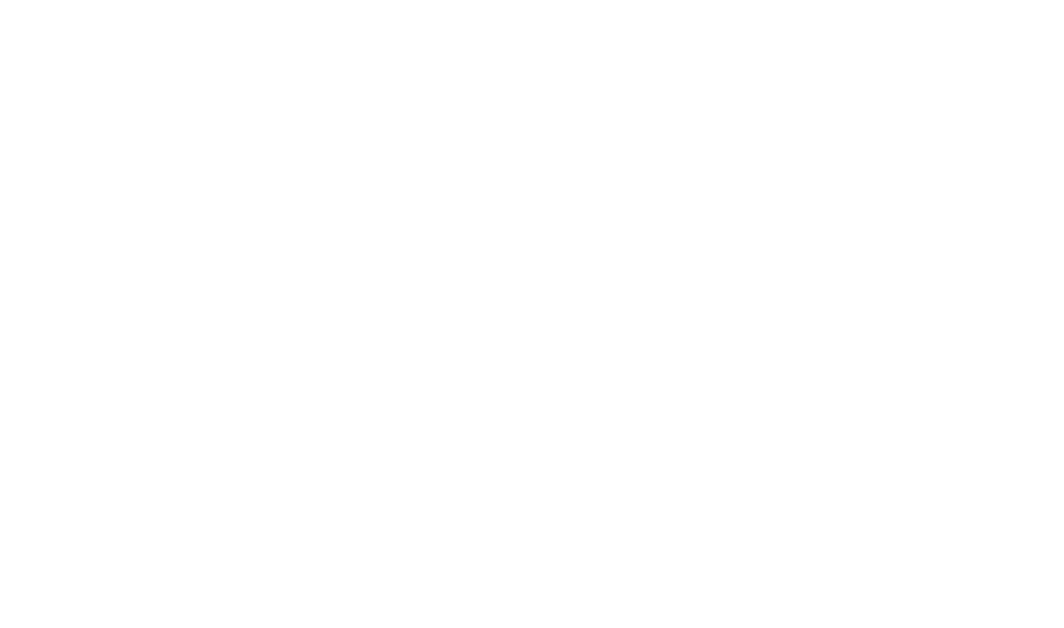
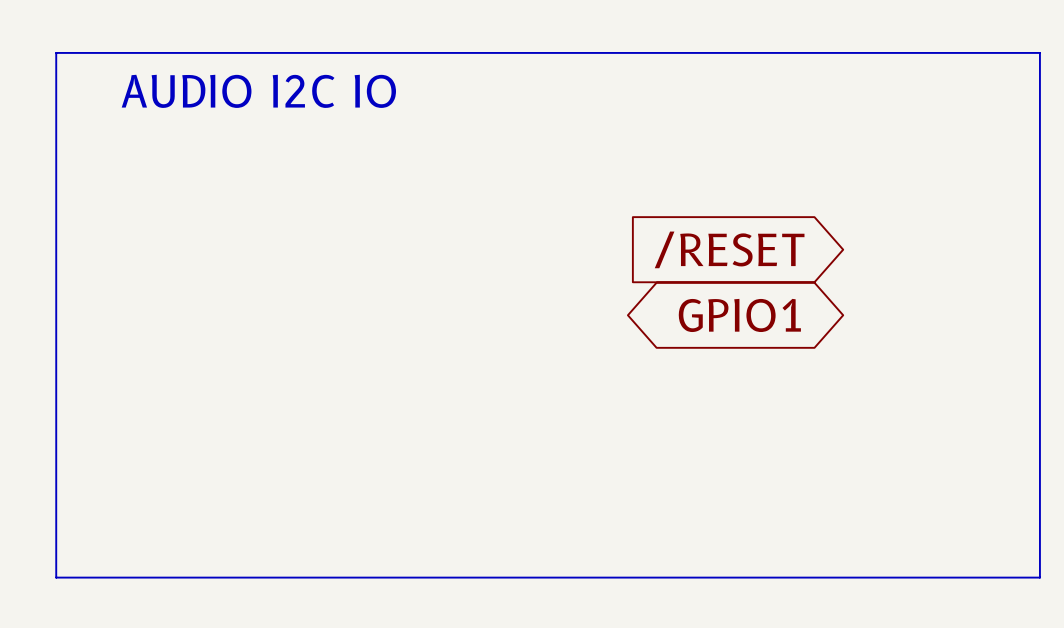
line: none -> (56, 52) (1039, 52) (1039, 577) (56, 577) (56, 52)
text: none -> AUDIO I2C IO (258, 91)
global label: none -> /RESET (729, 249)
global label: none -> GPIO1 (739, 315)

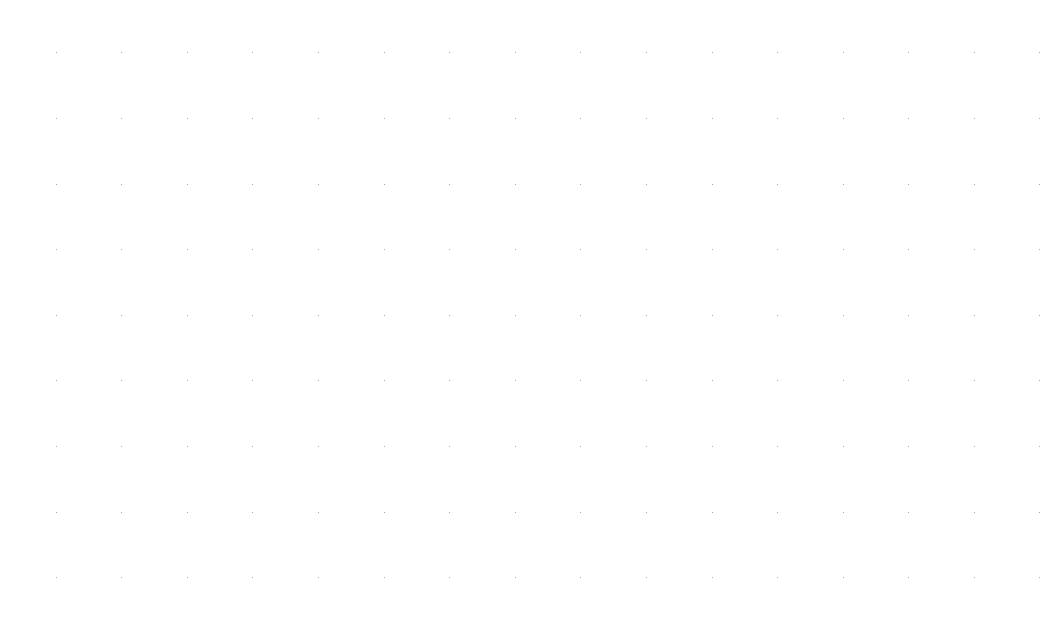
line: (56, 52) (1039, 52) (1039, 577) (56, 577) (56, 52) -> none
text: AUDIO I2C IO (258, 91) -> none
global label: /RESET (729, 249) -> none
global label: GPIO1 (739, 315) -> none

